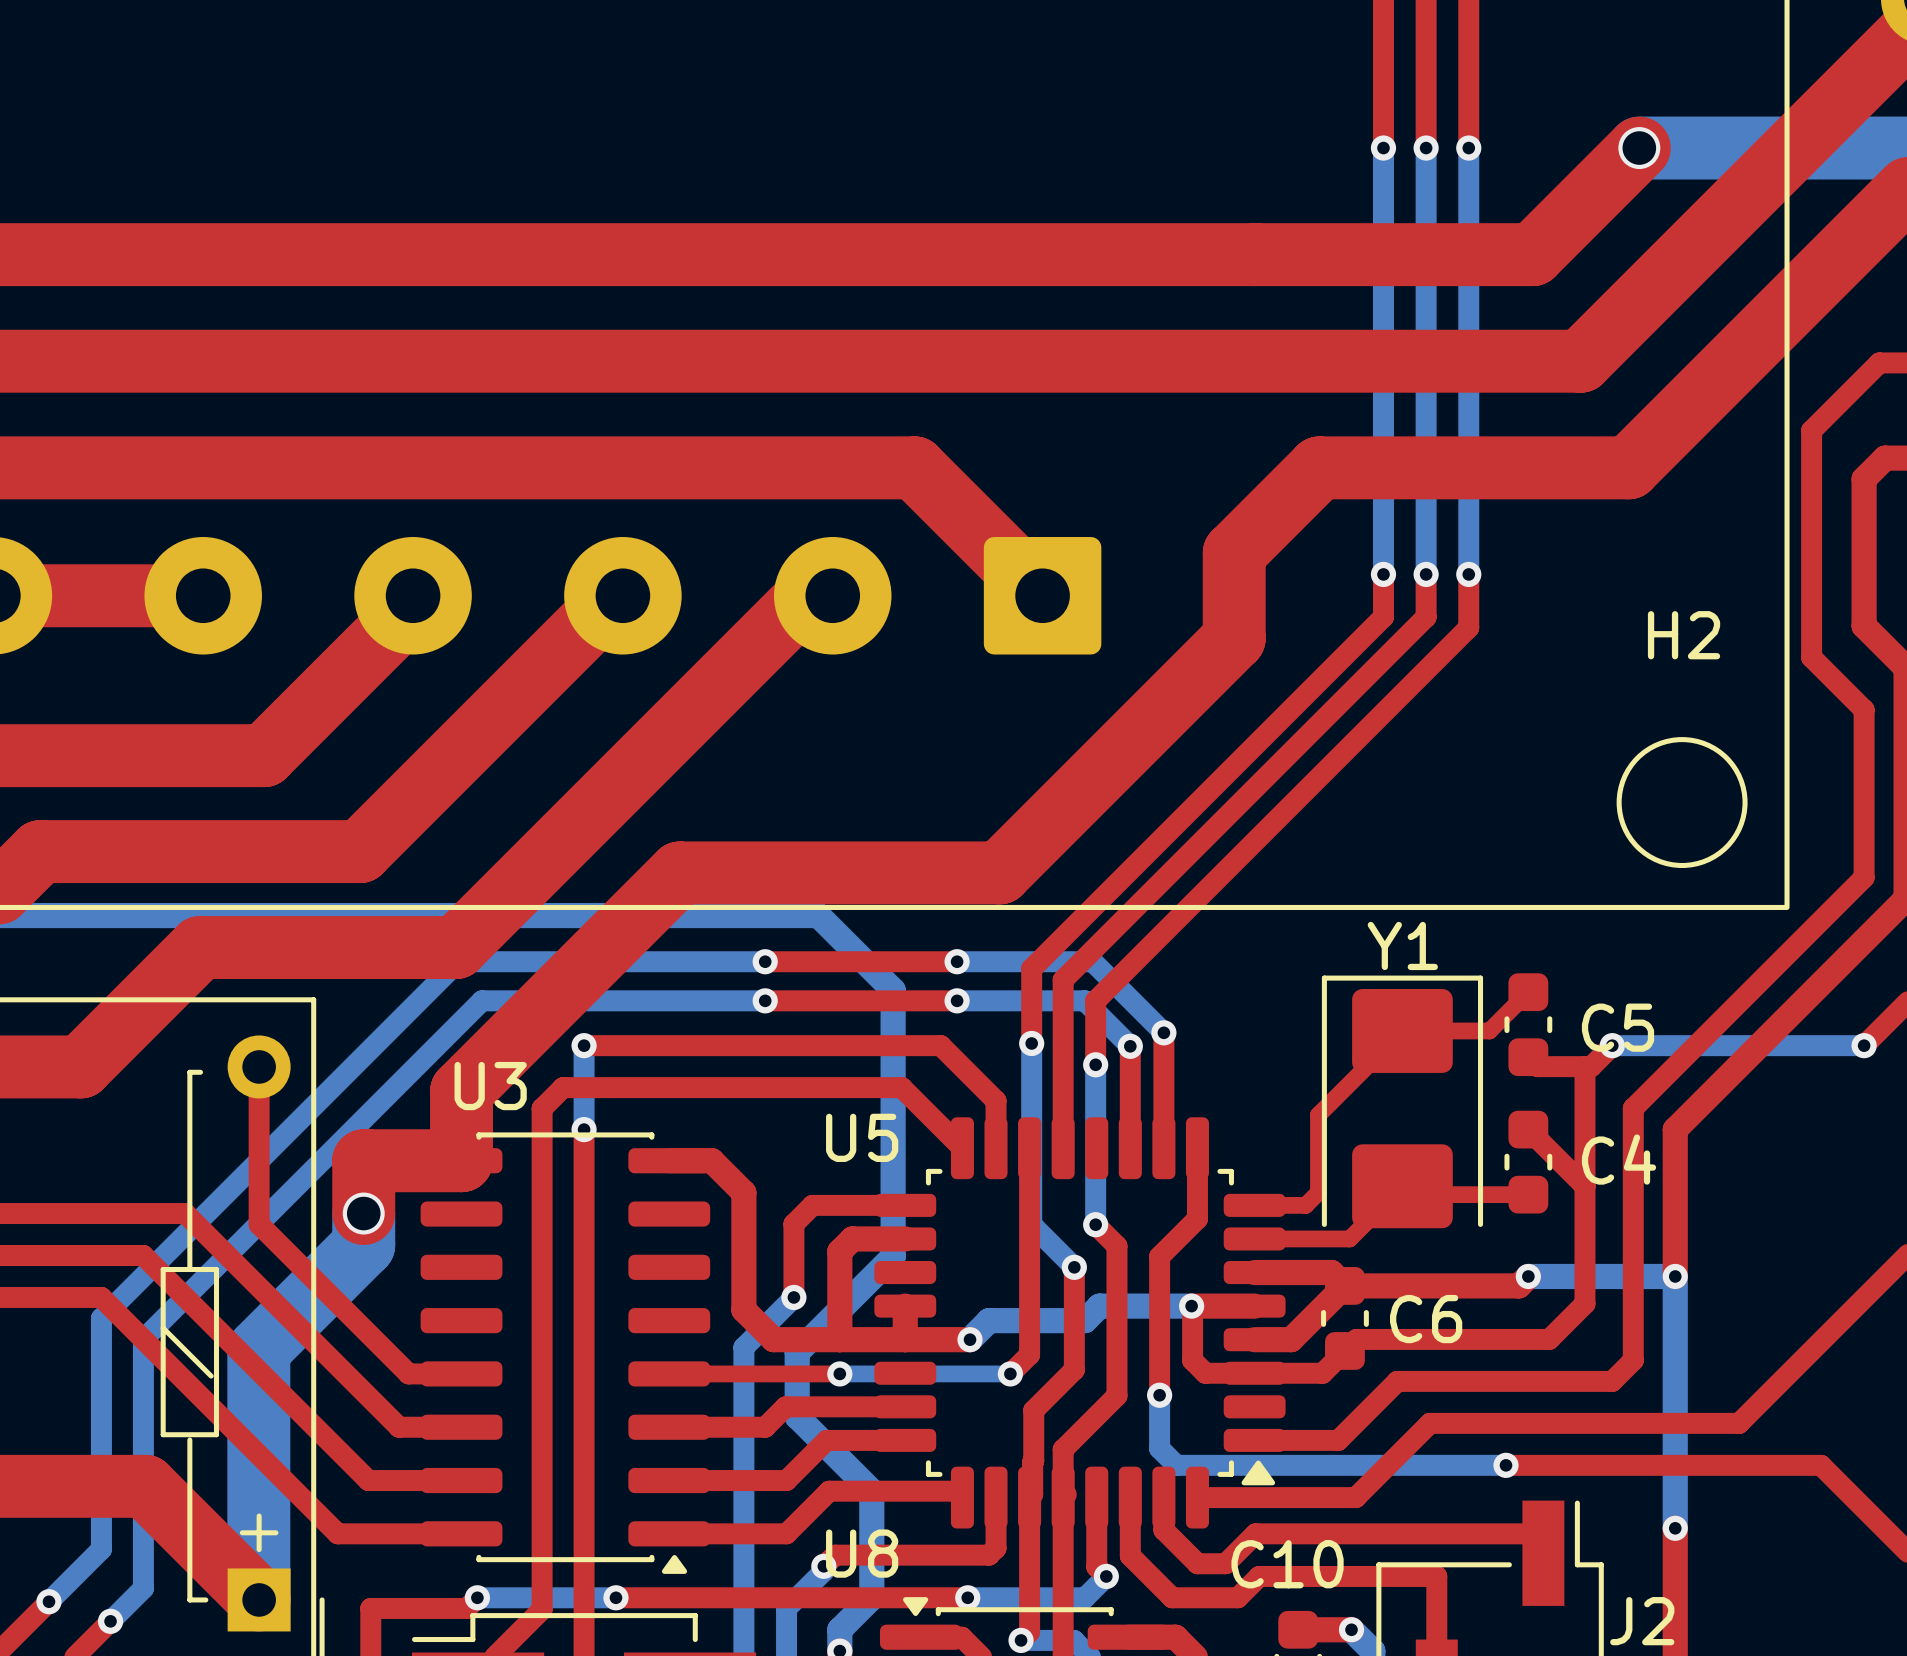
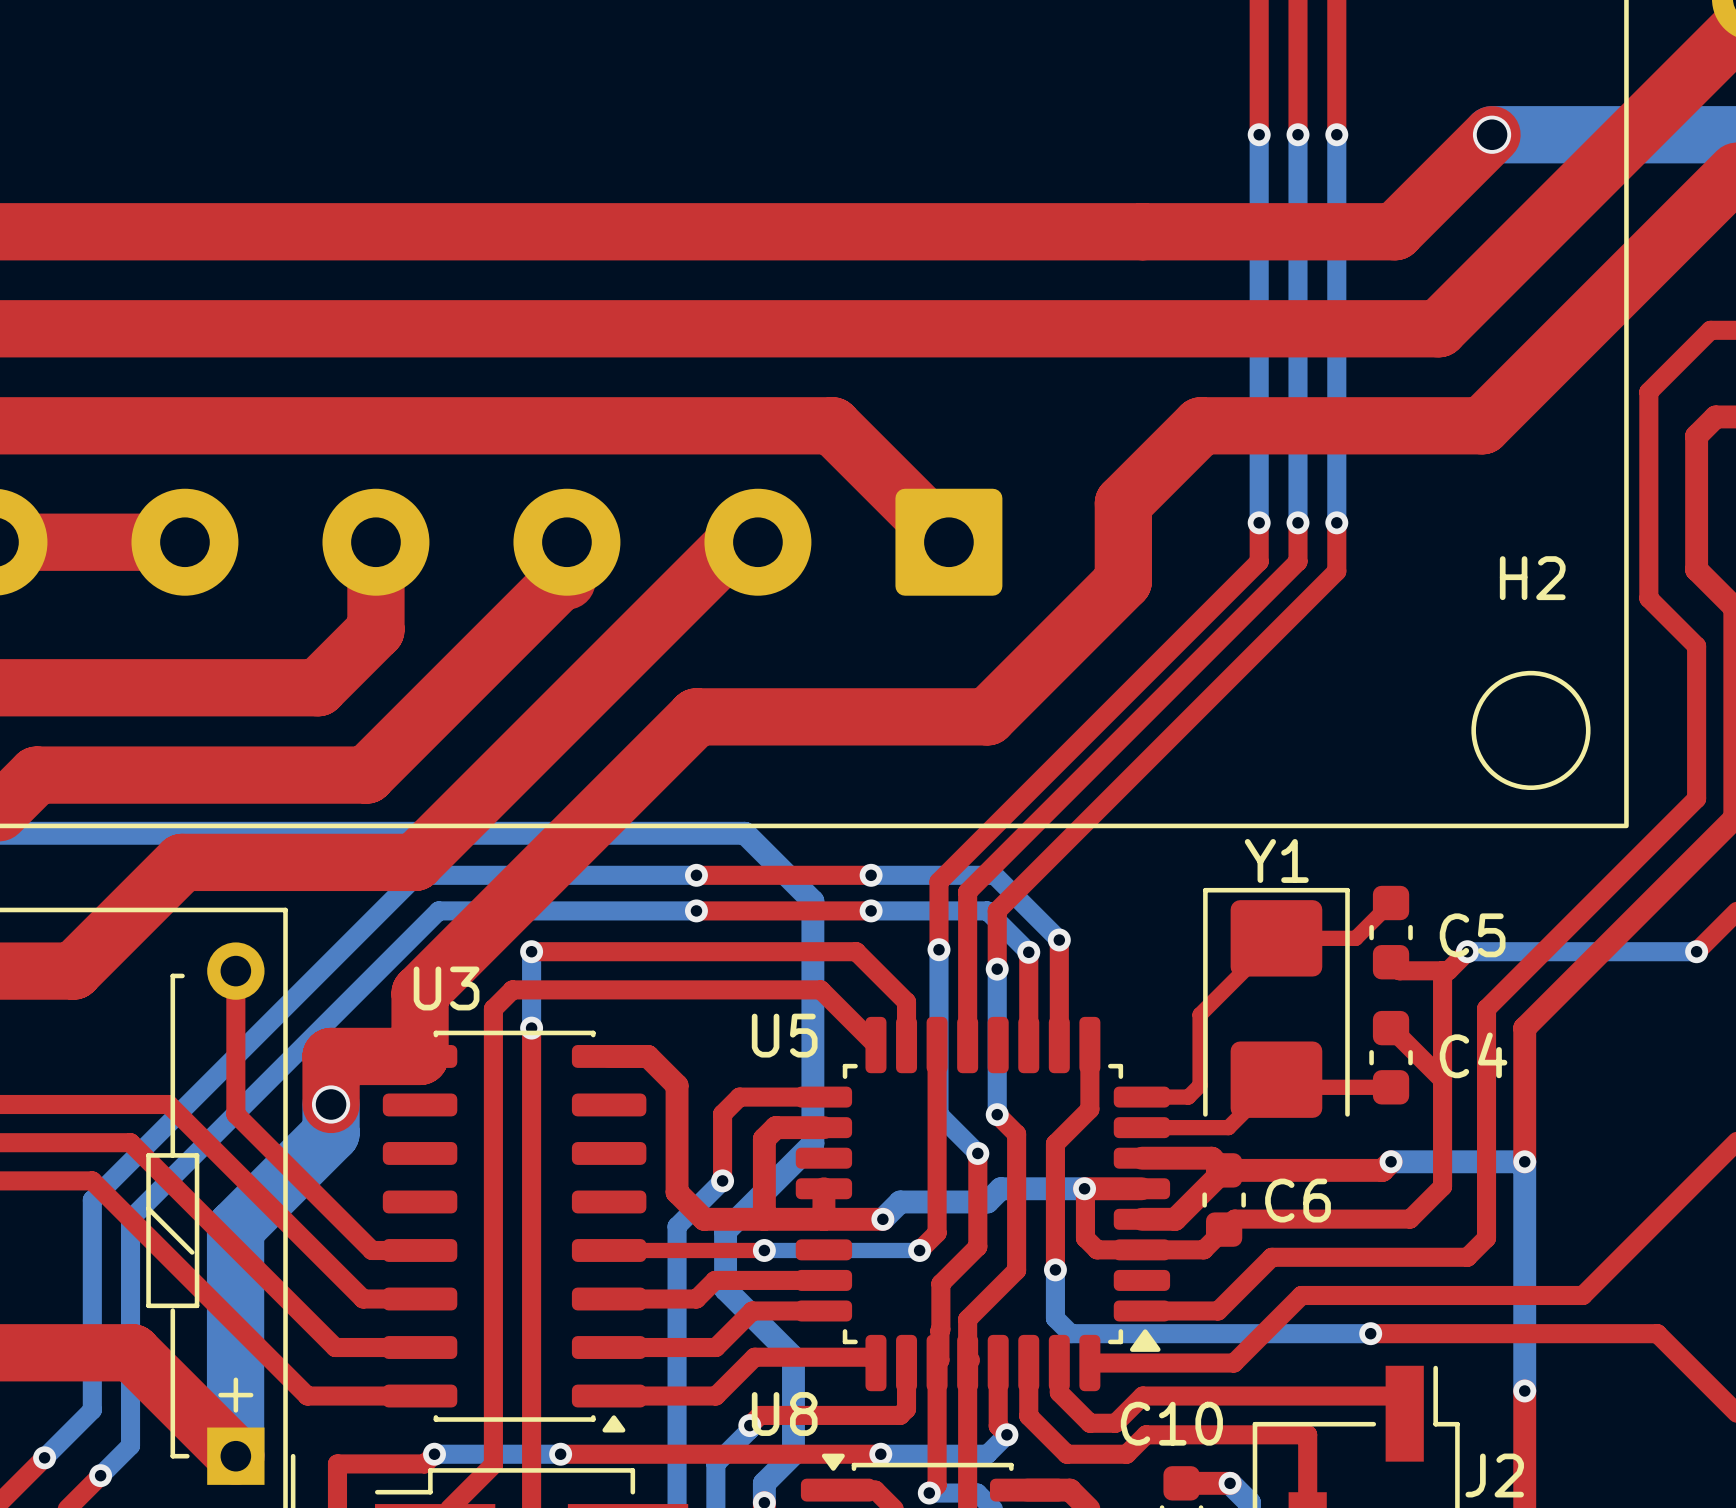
top track: (622, 595) (615, 595) (360, 851) -> (566, 581) (560, 581) (366, 775) (327, 775)
top track: (413, 606) (264, 755) -> (375, 552) (375, 629) (318, 687) (240, 687)
top track: (1085, 787) (999, 872) (679, 872) -> (987, 716) (696, 716) (618, 794)

